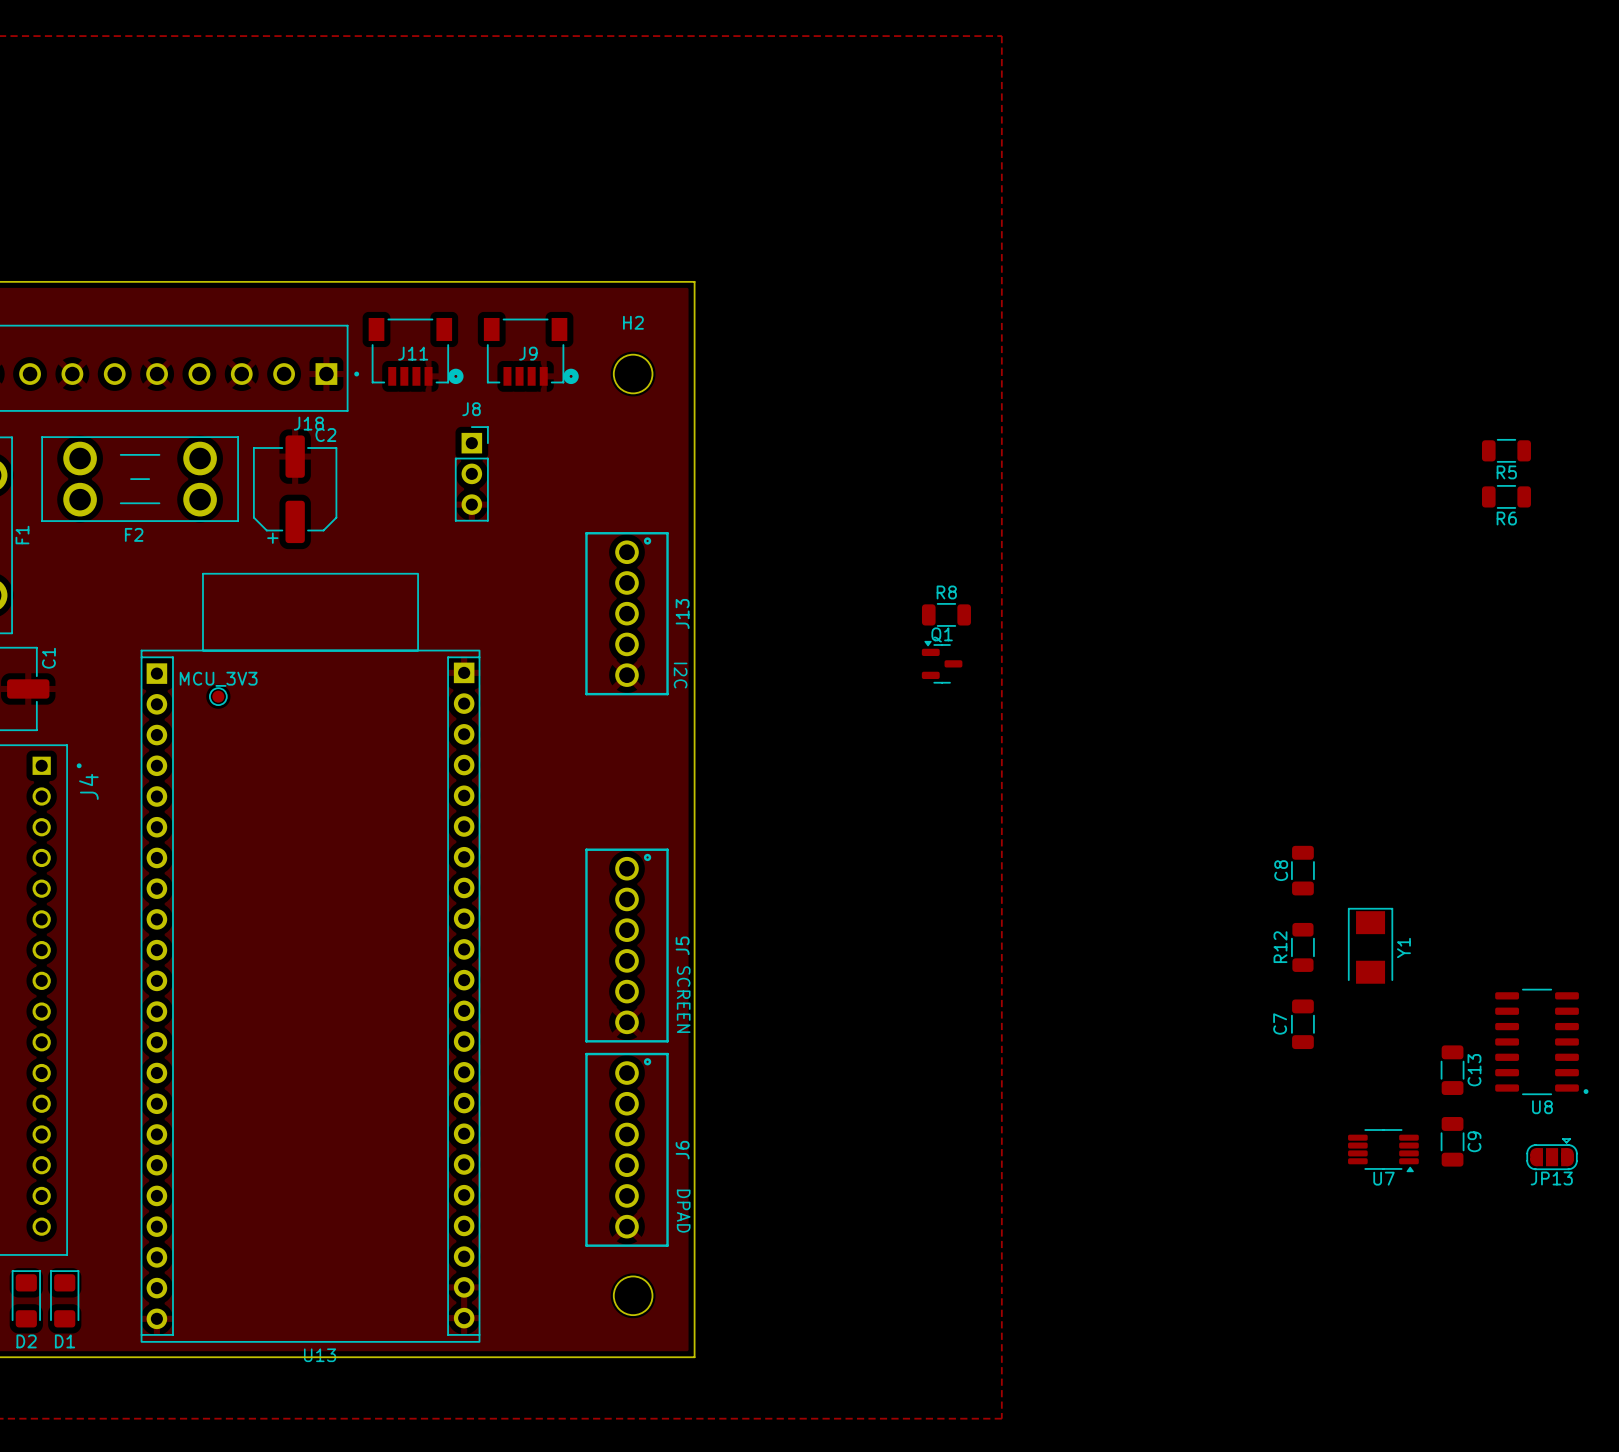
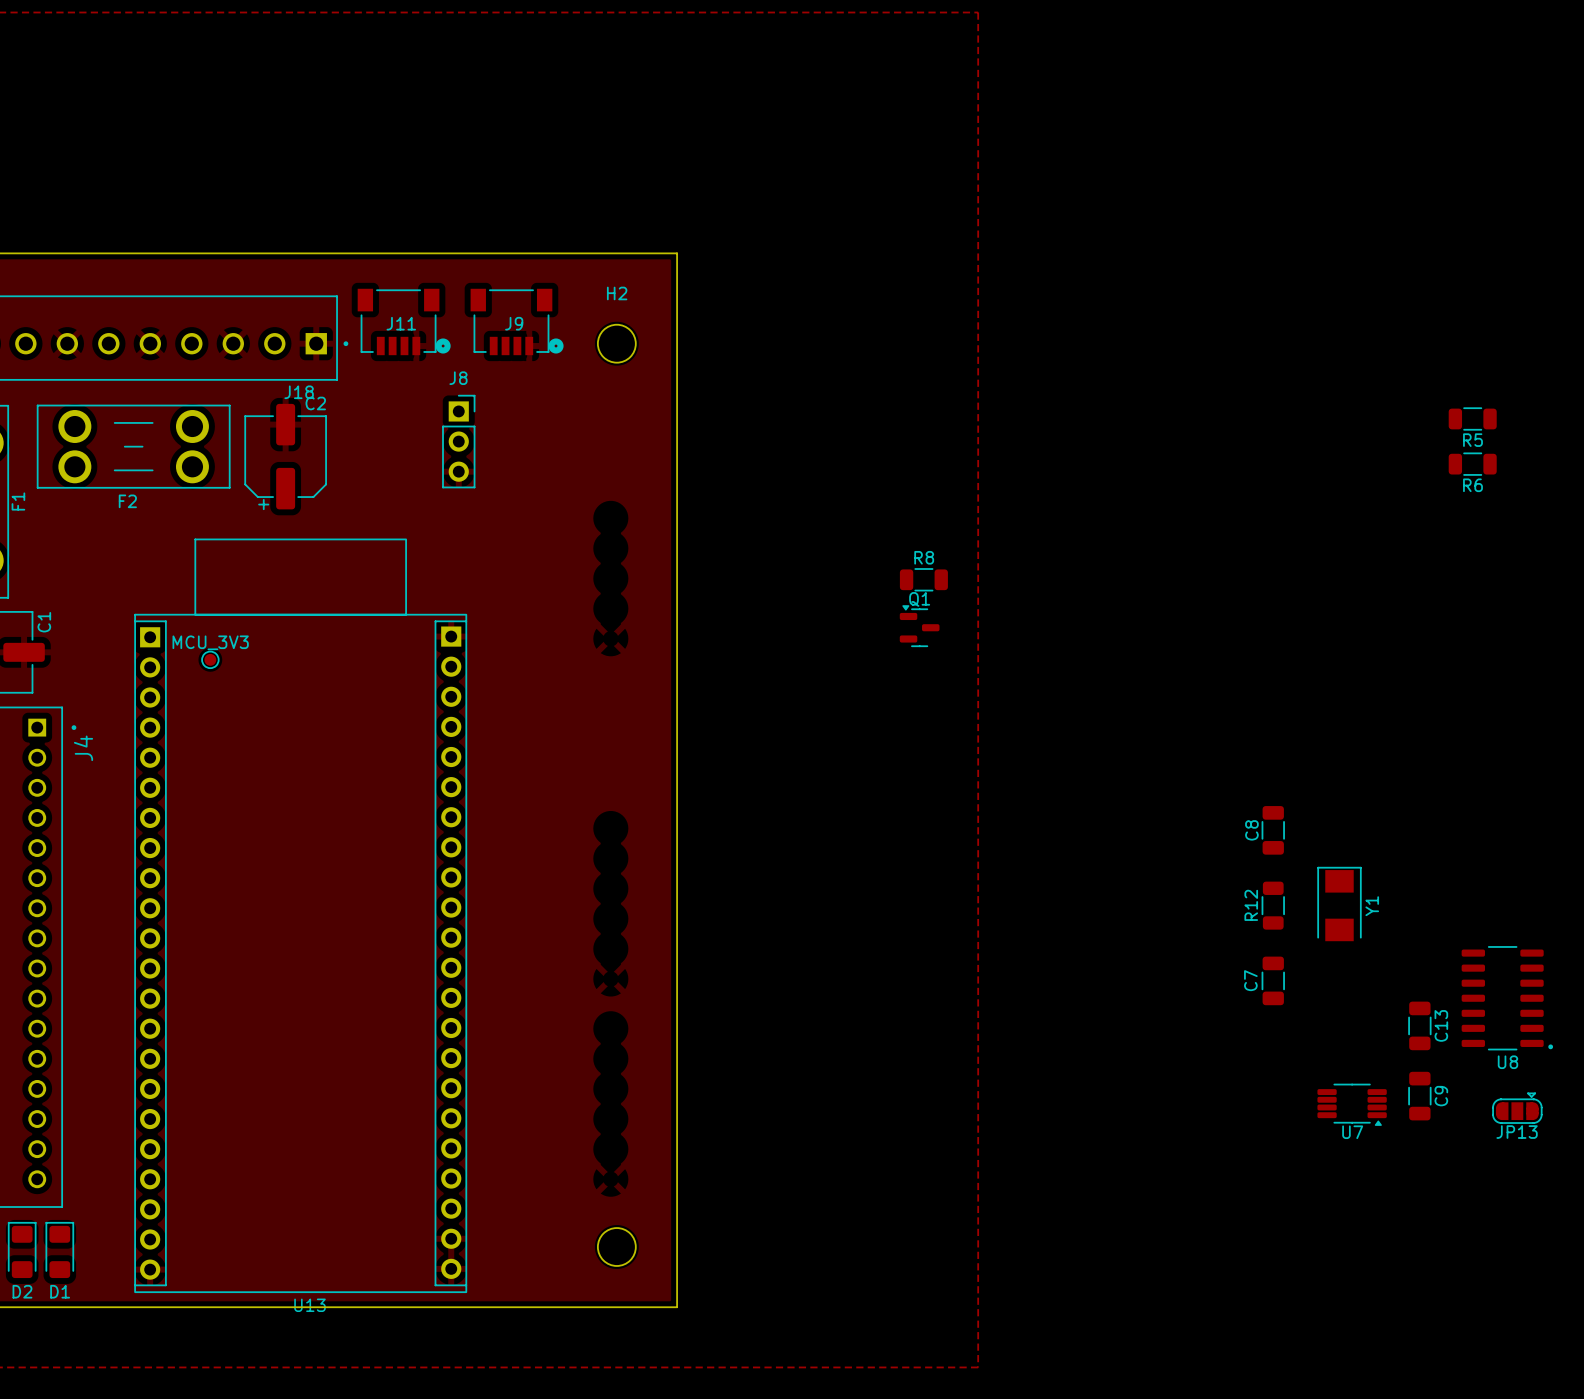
J13: (626, 613) -> none
J5: (626, 945) -> none
J6: (626, 1149) -> none

